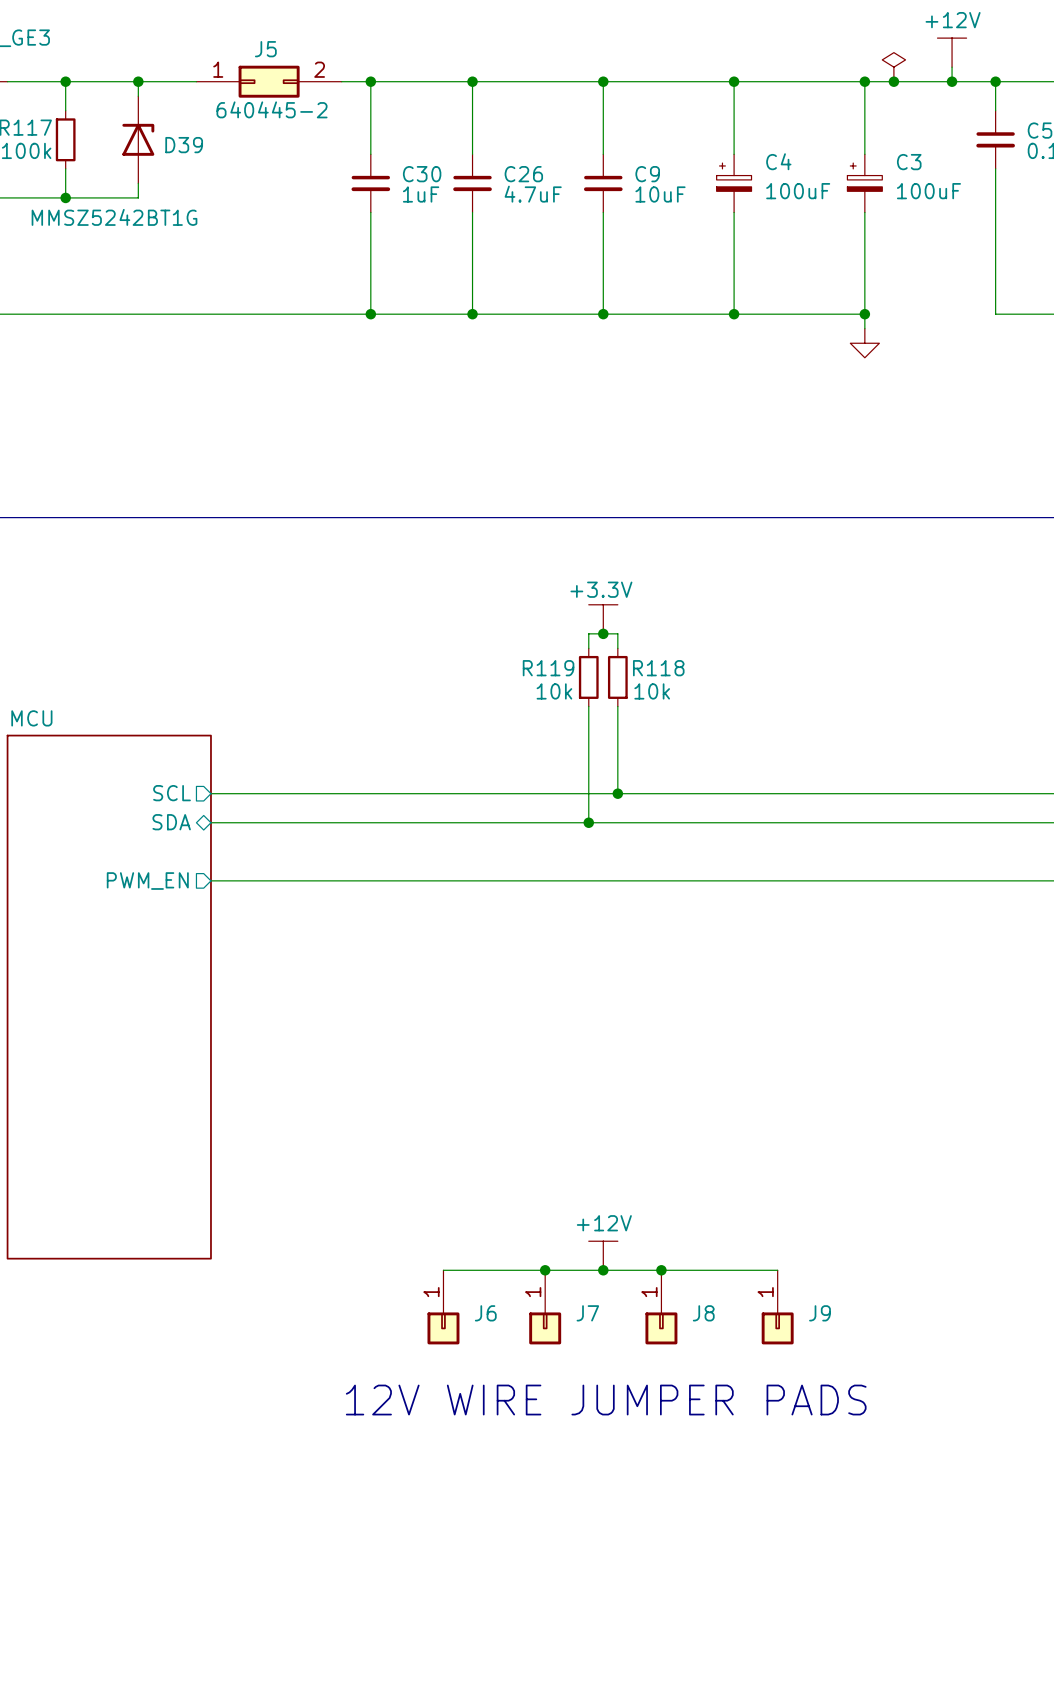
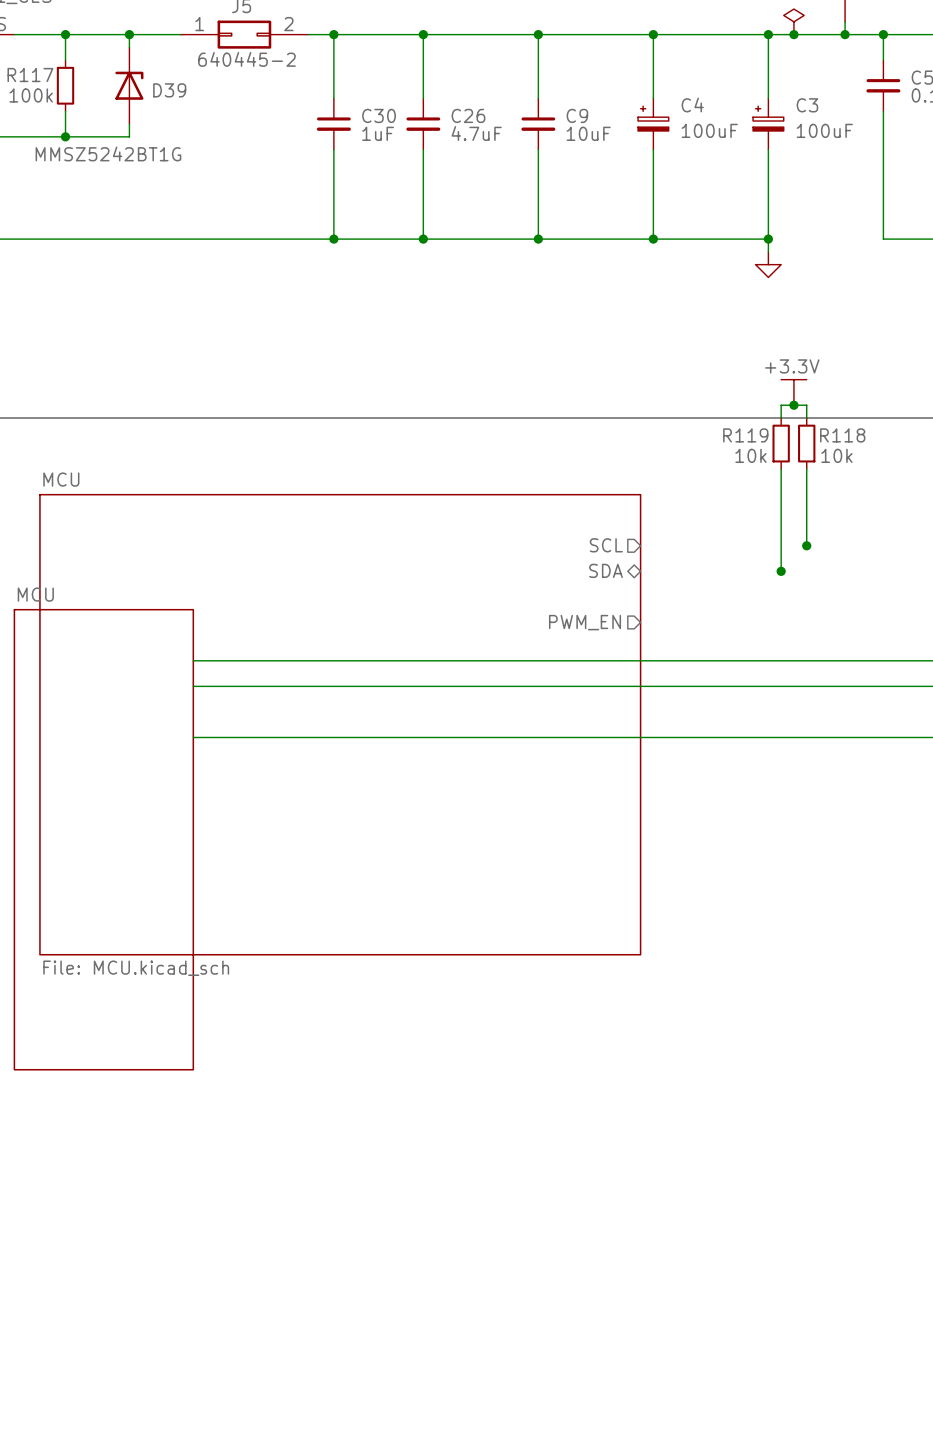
power symbol: none -> +3.3V (793, 392)
junction: none -> (793, 405)
wire: none -> (781, 418) (781, 405) (806, 405) (806, 418)
wire: none -> (781, 469) (781, 571)
wire: none -> (806, 469) (806, 545)
power symbol: +3.3V (603, 619) -> none
junction: (603, 633) -> none
wire: (588, 648) (588, 633) (617, 633) (617, 648) -> none
sheet pin: none -> SCL (606, 545)
junction: none -> (806, 545)
R119 position: (588, 677) -> (781, 443)
R118 position: (617, 677) -> (806, 443)
sheet pin: none -> SDA (606, 570)
junction: none -> (781, 571)
wire: (588, 706) (588, 822) -> none
wire: (617, 706) (617, 793) -> none
sheet pin: none -> PWM_EN (585, 622)
sheet pin: SCL (172, 793) -> none
junction: (617, 793) -> none
sheet pin: SDA (171, 822) -> none
junction: (588, 822) -> none
sheet MCU: none -> File: MCU.kicad_sch (340, 724)
sheet pin: PWM_EN (147, 881) -> none
power symbol: +12V (603, 1255) -> none
wire: (443, 1270) (777, 1270) -> none
junction: (545, 1270) -> none
junction: (603, 1270) -> none
junction: (661, 1270) -> none
J6: (443, 1307) -> none
J7: (545, 1307) -> none
J8: (661, 1307) -> none
J9: (777, 1307) -> none
text: 12V WIRE JUMPER PADS (606, 1400) -> none

